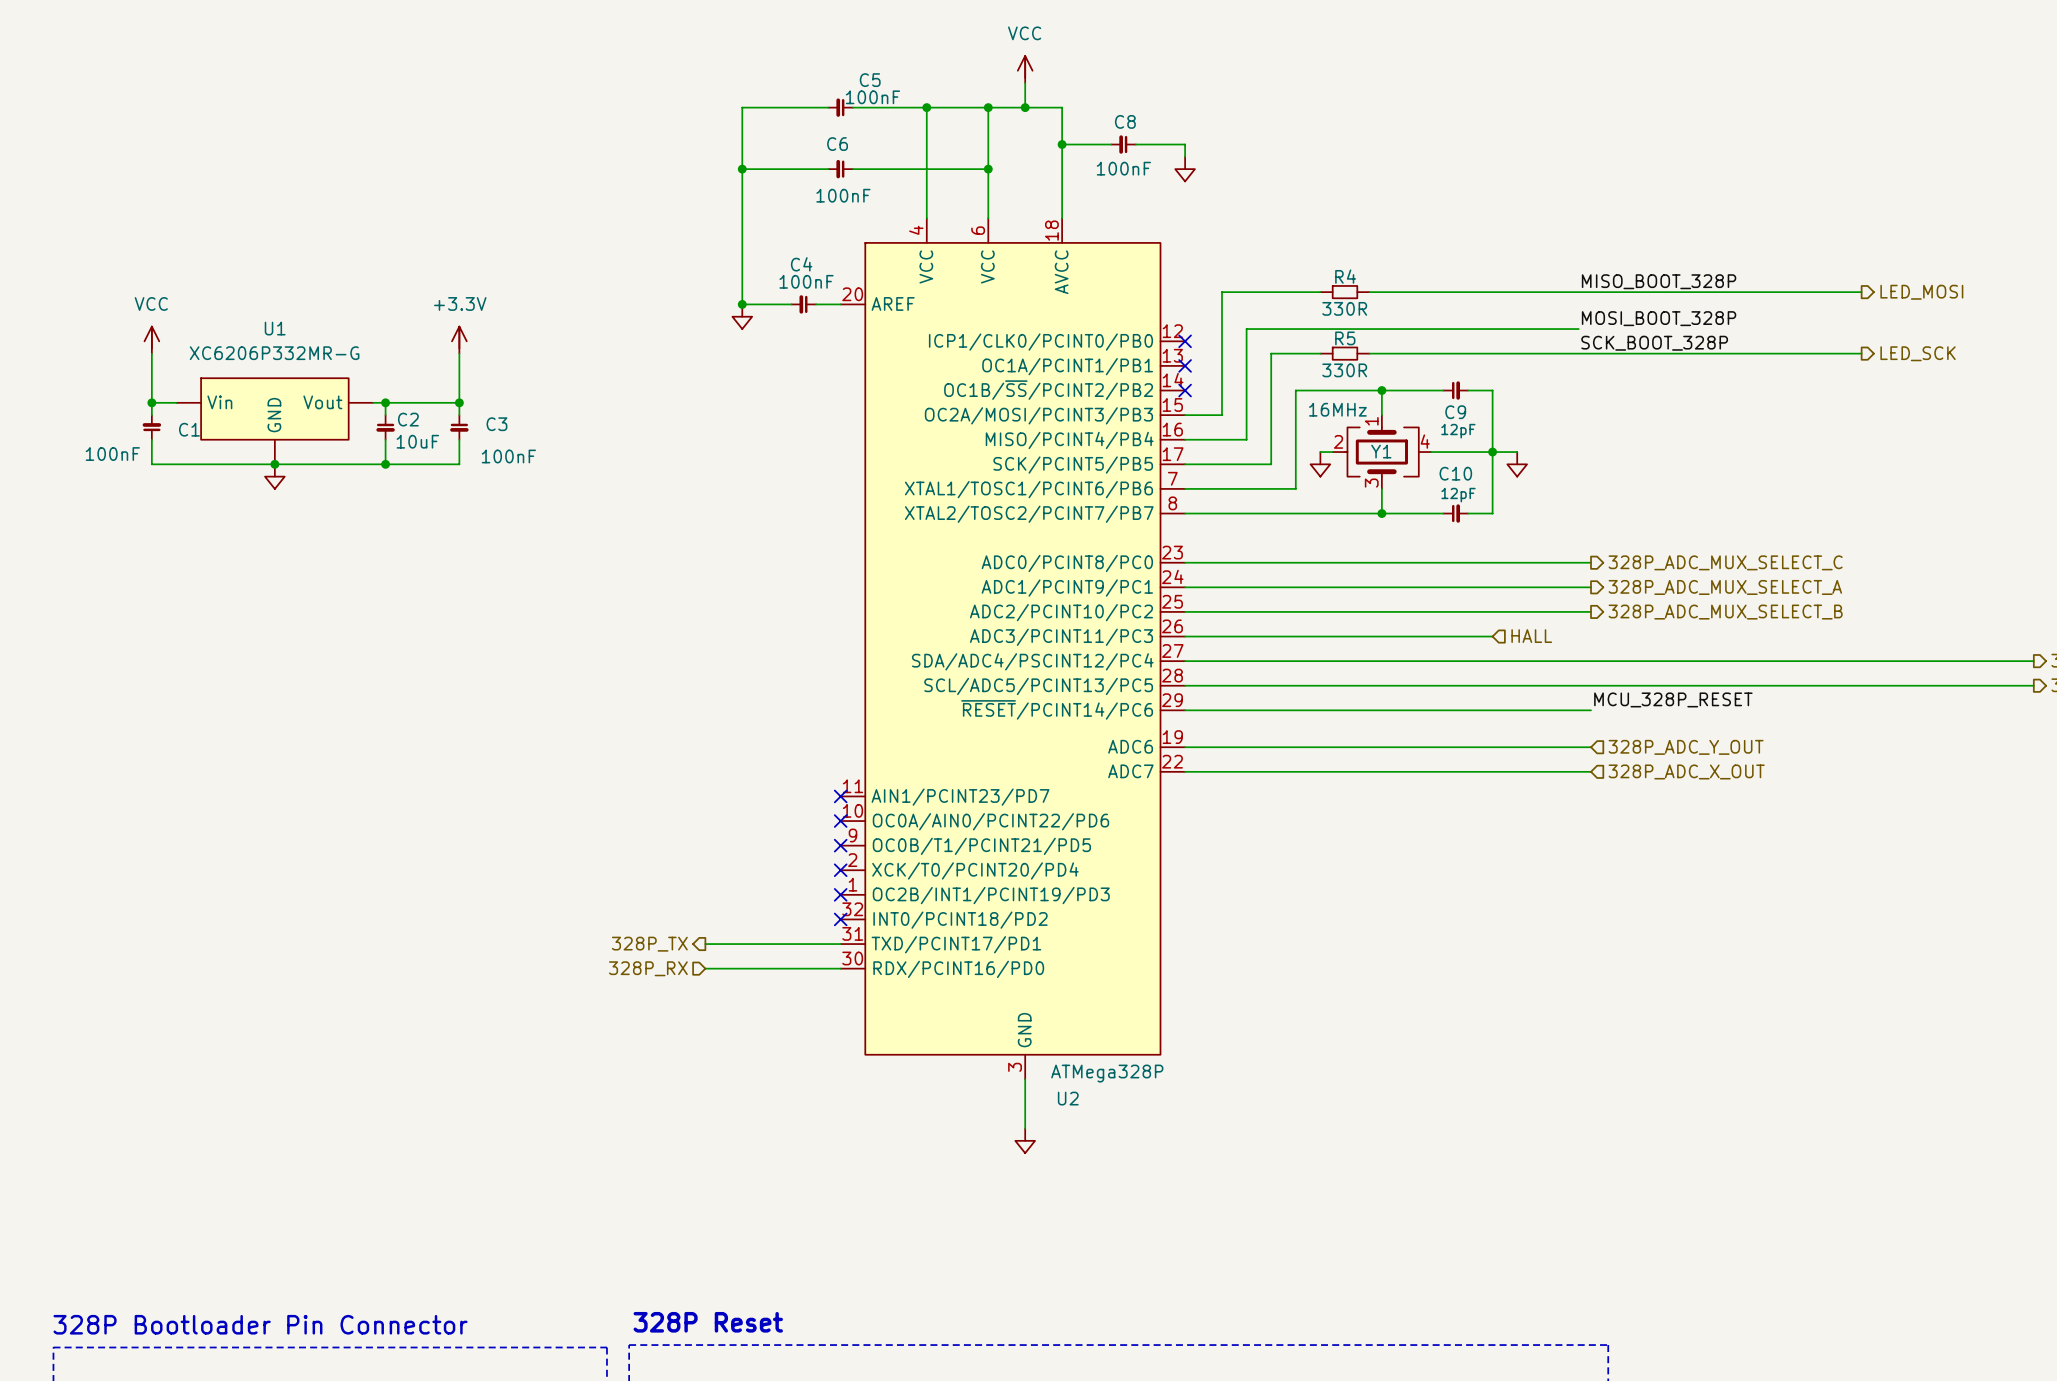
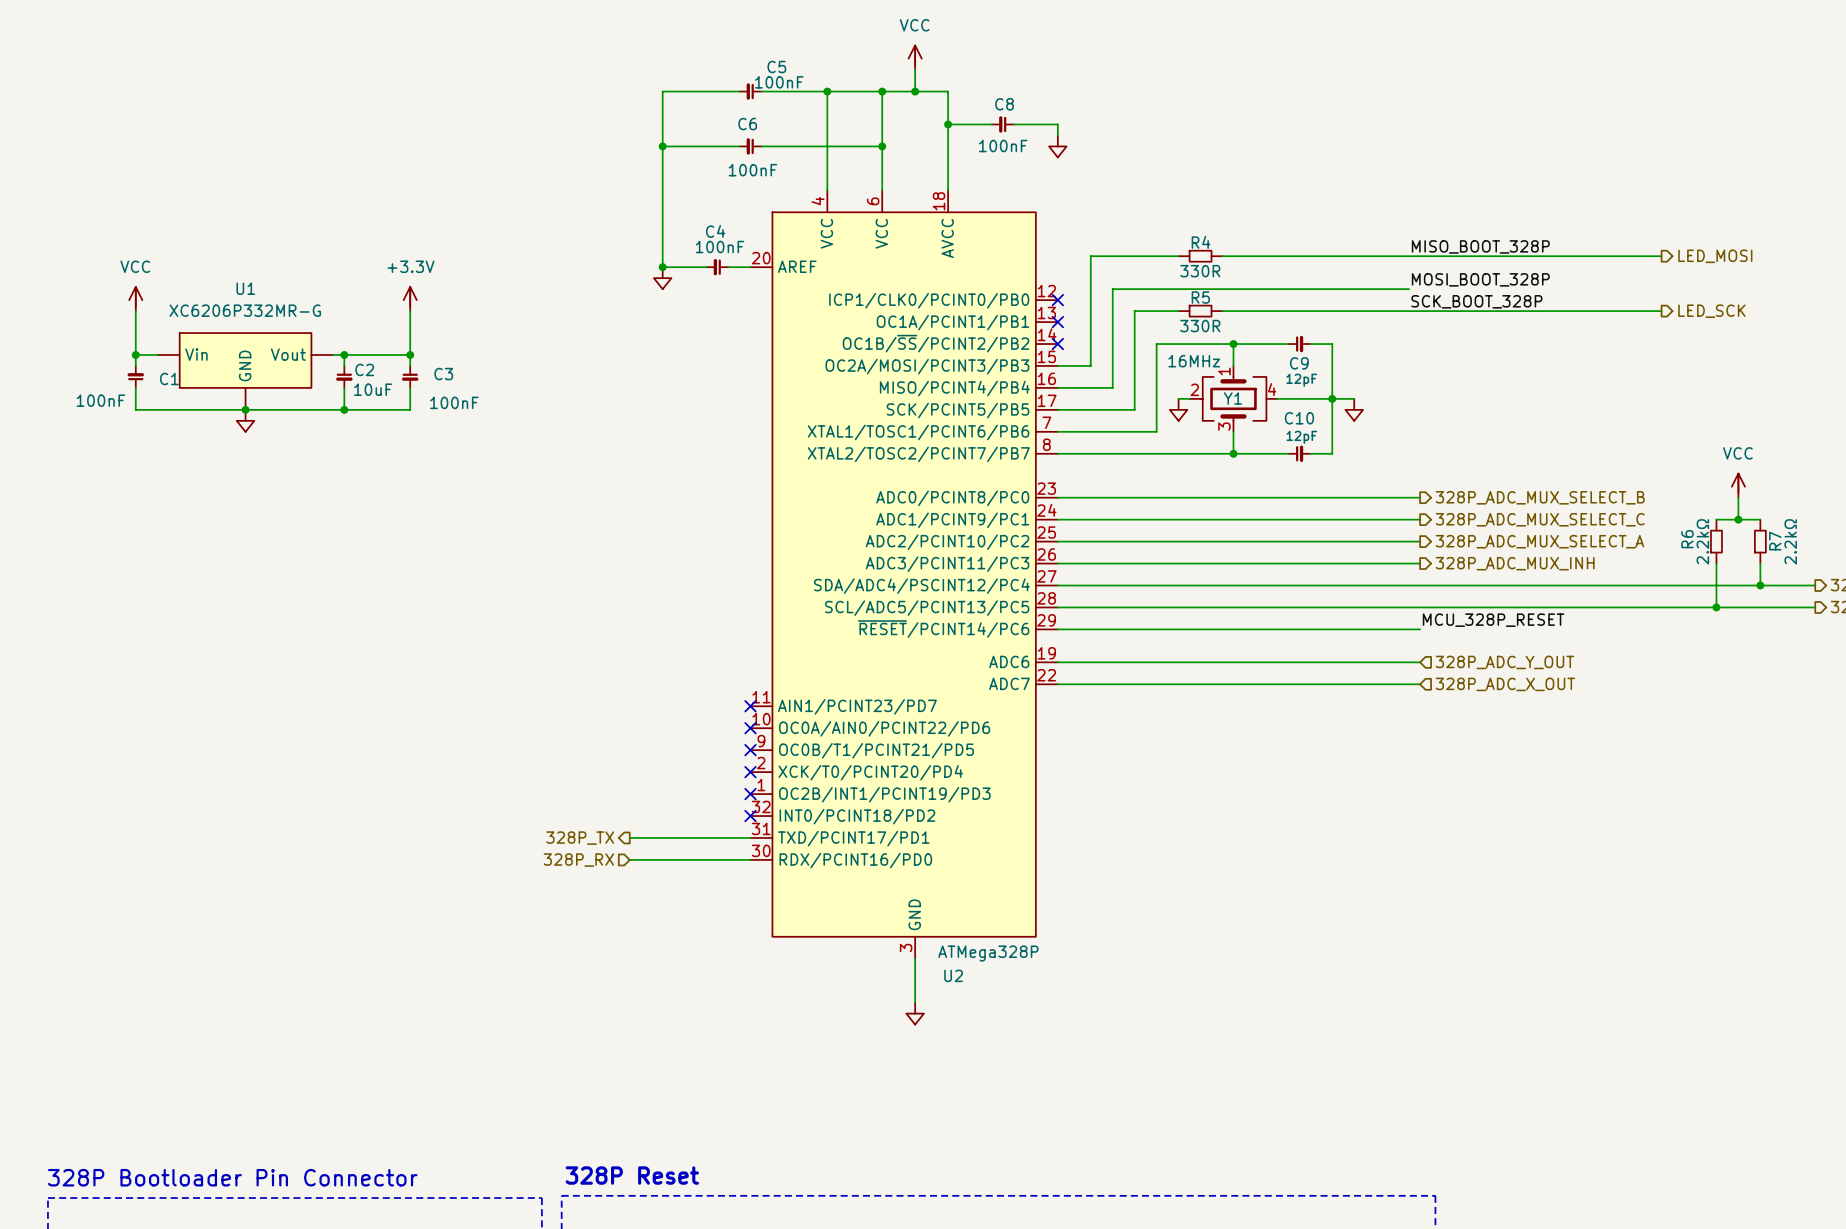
power symbol: none -> VCC (1738, 485)
hierarchical label: 328P_ADC_MUX_SELECT_C (1725, 562) -> 328P_ADC_MUX_SELECT_B (1540, 497)
wire: none -> (1738, 497) (1738, 519)
hierarchical label: 328P_ADC_MUX_SELECT_A (1725, 587) -> 328P_ADC_MUX_SELECT_C (1540, 519)
wire: none -> (1716, 519) (1760, 519)
junction: none -> (1738, 519)
R6: none -> 2.2kΩ (1716, 541)
R7: none -> 2.2kΩ (1760, 541)
hierarchical label: 328P_ADC_MUX_SELECT_B (1725, 612) -> 328P_ADC_MUX_SELECT_A (1539, 541)
wire: none -> (1332, 563) (1420, 563)
hierarchical label: HALL (1531, 636) -> none
hierarchical label: none -> 328P_ADC_MUX_INH (1515, 563)
wire: none -> (1716, 563) (1716, 607)
wire: none -> (1760, 563) (1760, 585)
junction: none -> (1760, 585)
junction: none -> (1716, 607)

